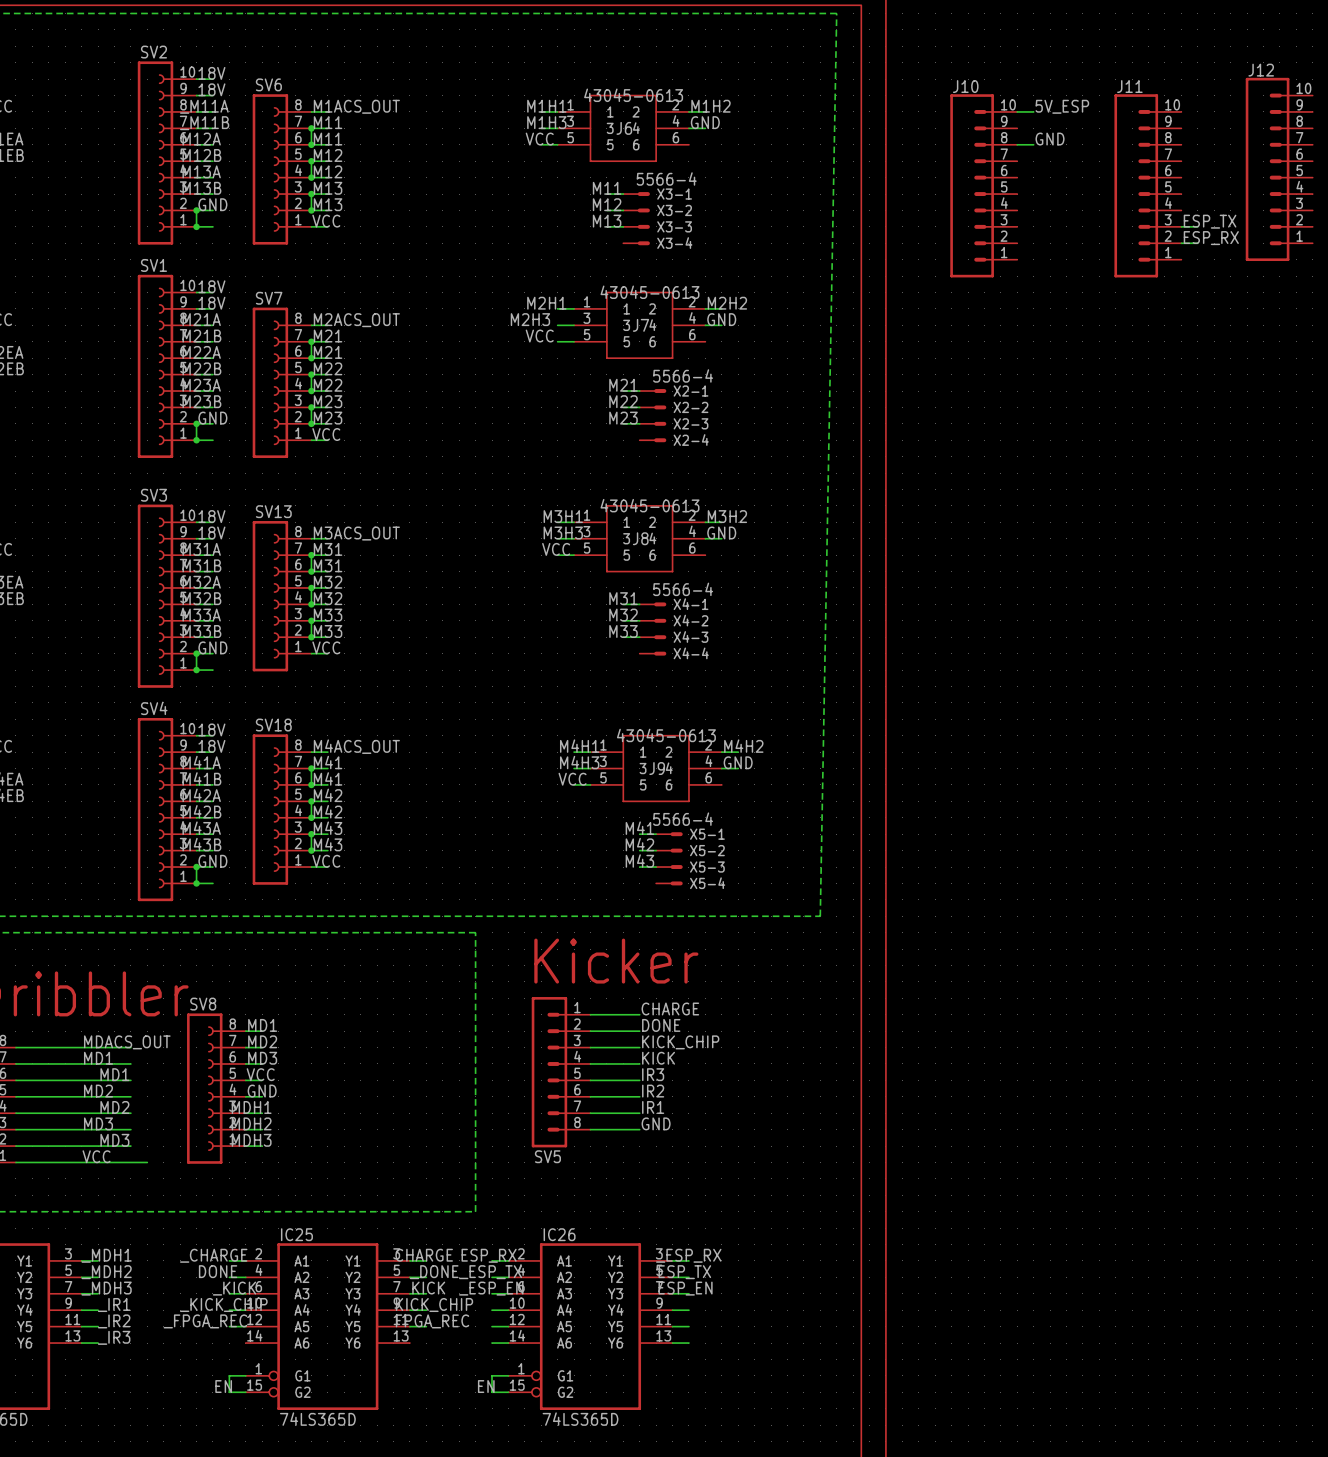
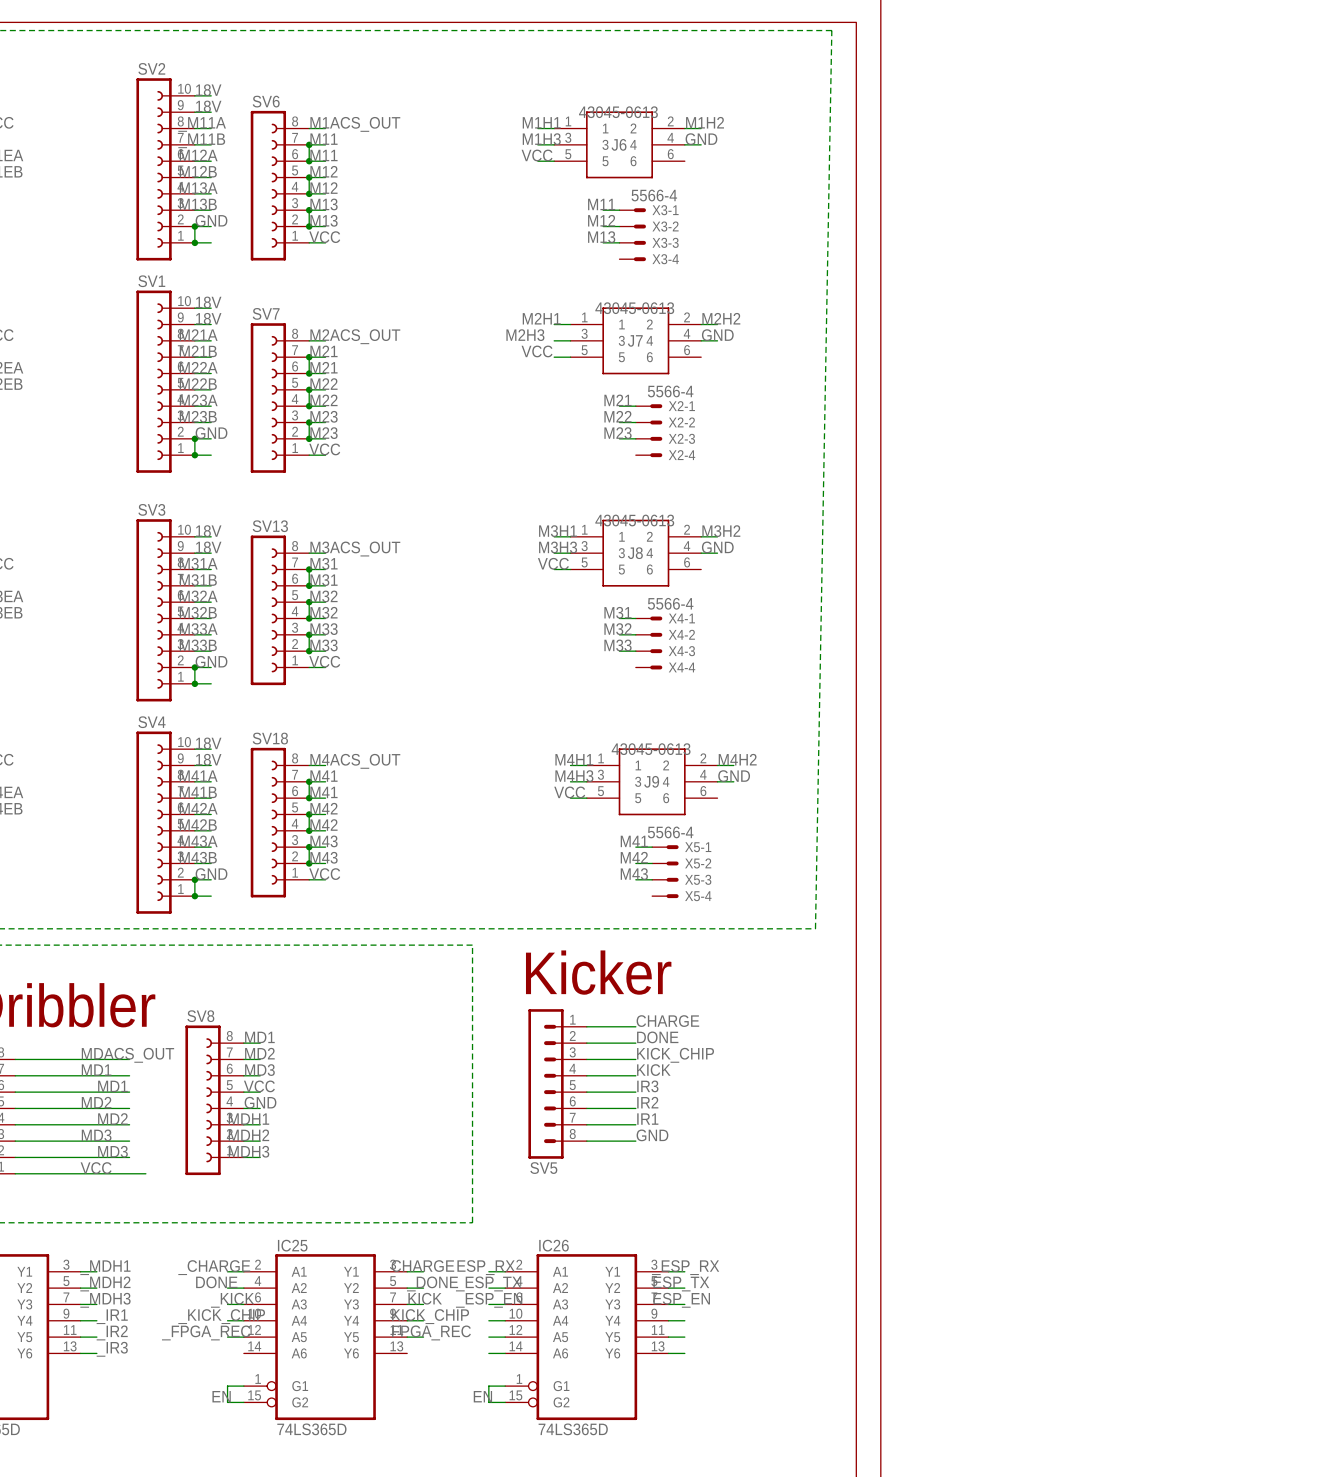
label: 5V_ESP (1062, 106) -> none
wire: (1017, 111) (1033, 111) -> none
label: GND (1050, 139) -> none
wire: (1017, 144) (1033, 144) -> none
J12: (1279, 169) -> none
J10: (983, 185) -> none
J11: (1147, 185) -> none
label: ESP_TX (1210, 221) -> none
wire: (1181, 226) (1197, 226) -> none
label: ESP_RX (1211, 238) -> none
wire: (1181, 243) (1197, 243) -> none

